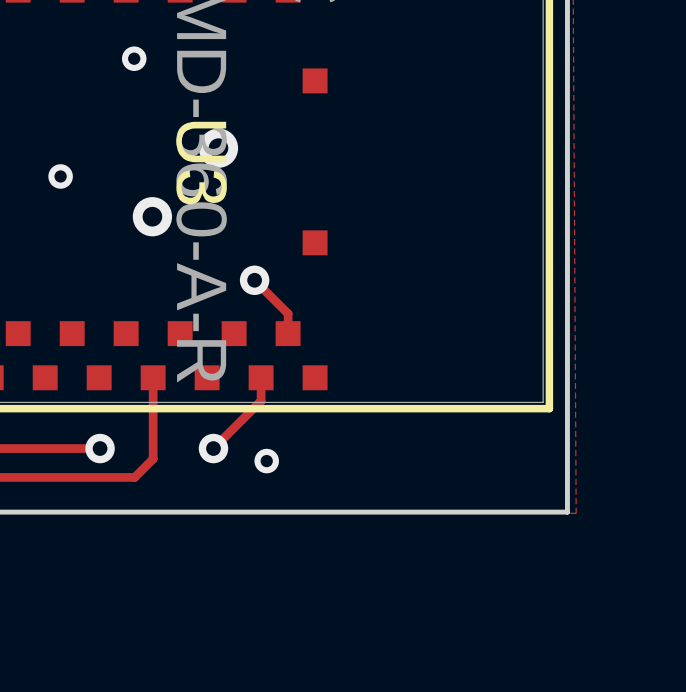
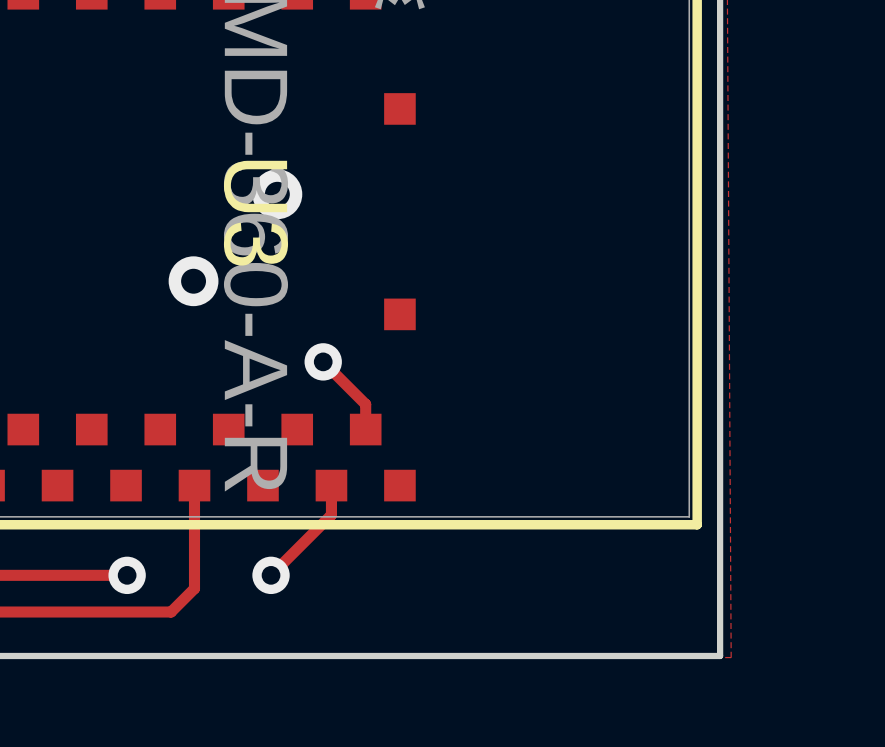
via: (134, 58) -> none
via: (60, 176) -> none
via: (266, 461) -> none

